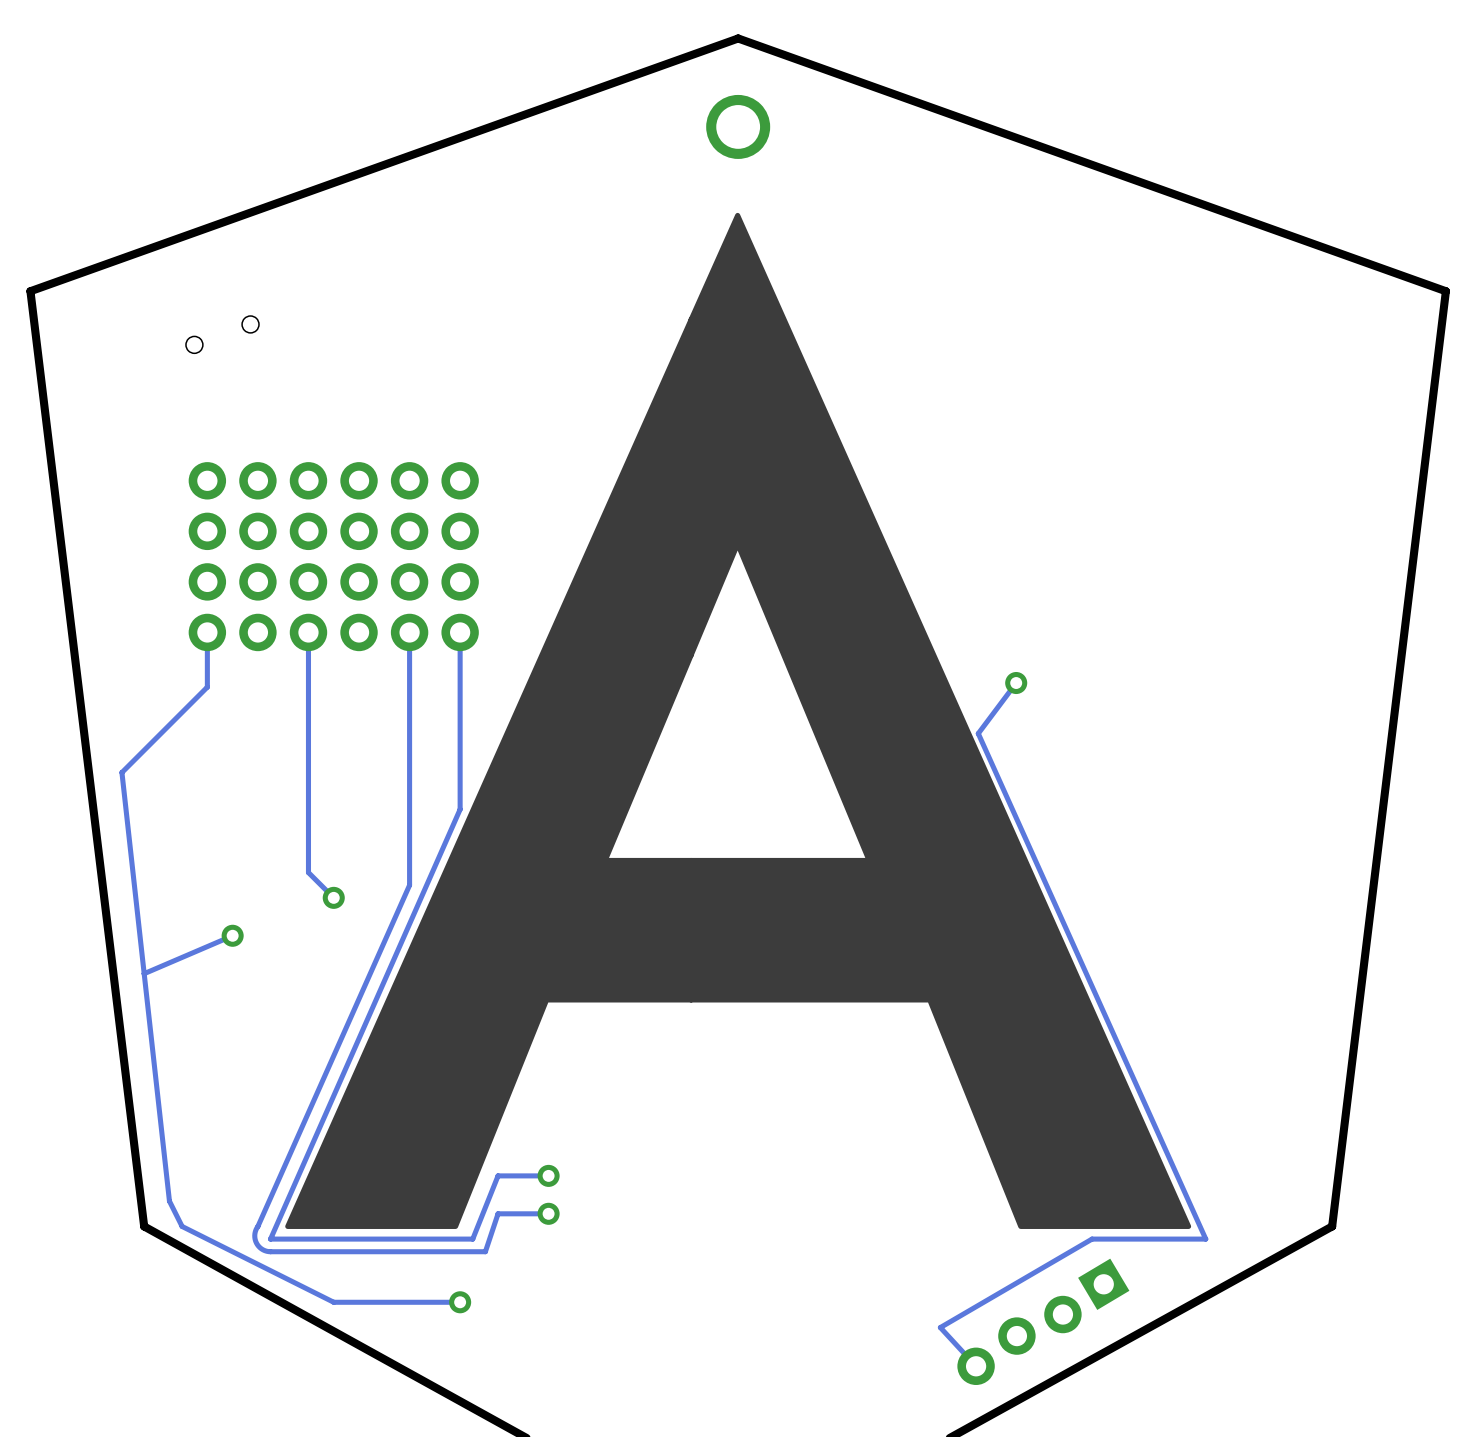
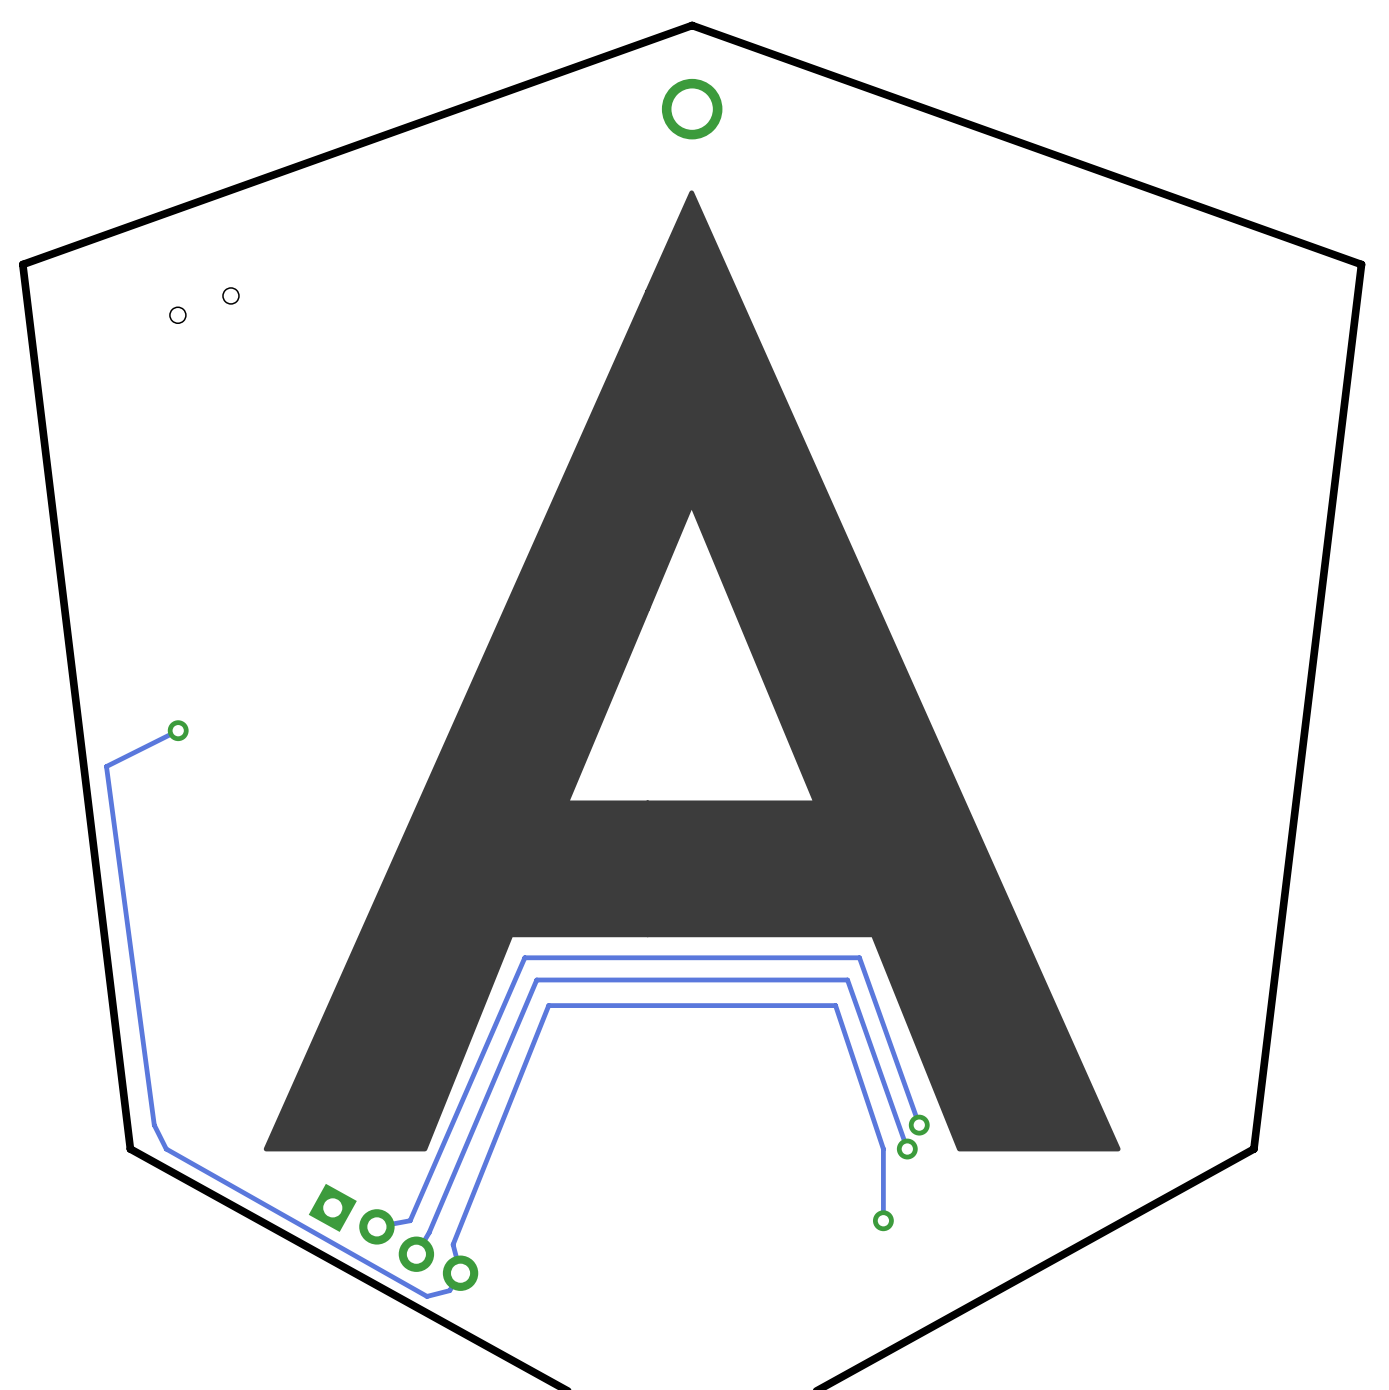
part: (333, 556) -> none
track: (207, 632) (207, 687) (121, 772) (144, 973) -> none
track: (308, 632) (308, 872) (333, 897) -> none
track: (409, 632) (409, 885) (256, 1229) (255, 1239) (261, 1248) (270, 1251) (485, 1251) (498, 1213) (548, 1213) -> none
track: (460, 632) (460, 809) (270, 1239) (472, 1239) (498, 1175) (548, 1175) -> none
track: (1016, 683) (978, 733) (1205, 1239) (1092, 1239) (940, 1327) (976, 1366) -> none
via: (1016, 683) -> none
via: none -> (178, 730)
via: (333, 897) -> none
track: (232, 935) (144, 973) -> none
via: (232, 935) -> none
track: (144, 973) (169, 1201) -> (178, 730) (106, 766) (154, 1125)
via: (548, 1175) -> none
track: none -> (919, 1125) (859, 957) (524, 957) (410, 1220) (376, 1226)
via: none -> (919, 1125)
via: (548, 1213) -> none
track: (182, 1226) (333, 1302) (460, 1302) -> (166, 1149) (427, 1296) (449, 1290) (460, 1273) (453, 1244) (548, 1005) (835, 1005) (883, 1149) (883, 1220)
track: none -> (907, 1149) (847, 979) (536, 979) (429, 1232) (416, 1254)
via: none -> (907, 1149)
via: (460, 1302) -> none
via: none -> (883, 1220)
part: none -> (393, 1237)
part: (1043, 1321) -> none

